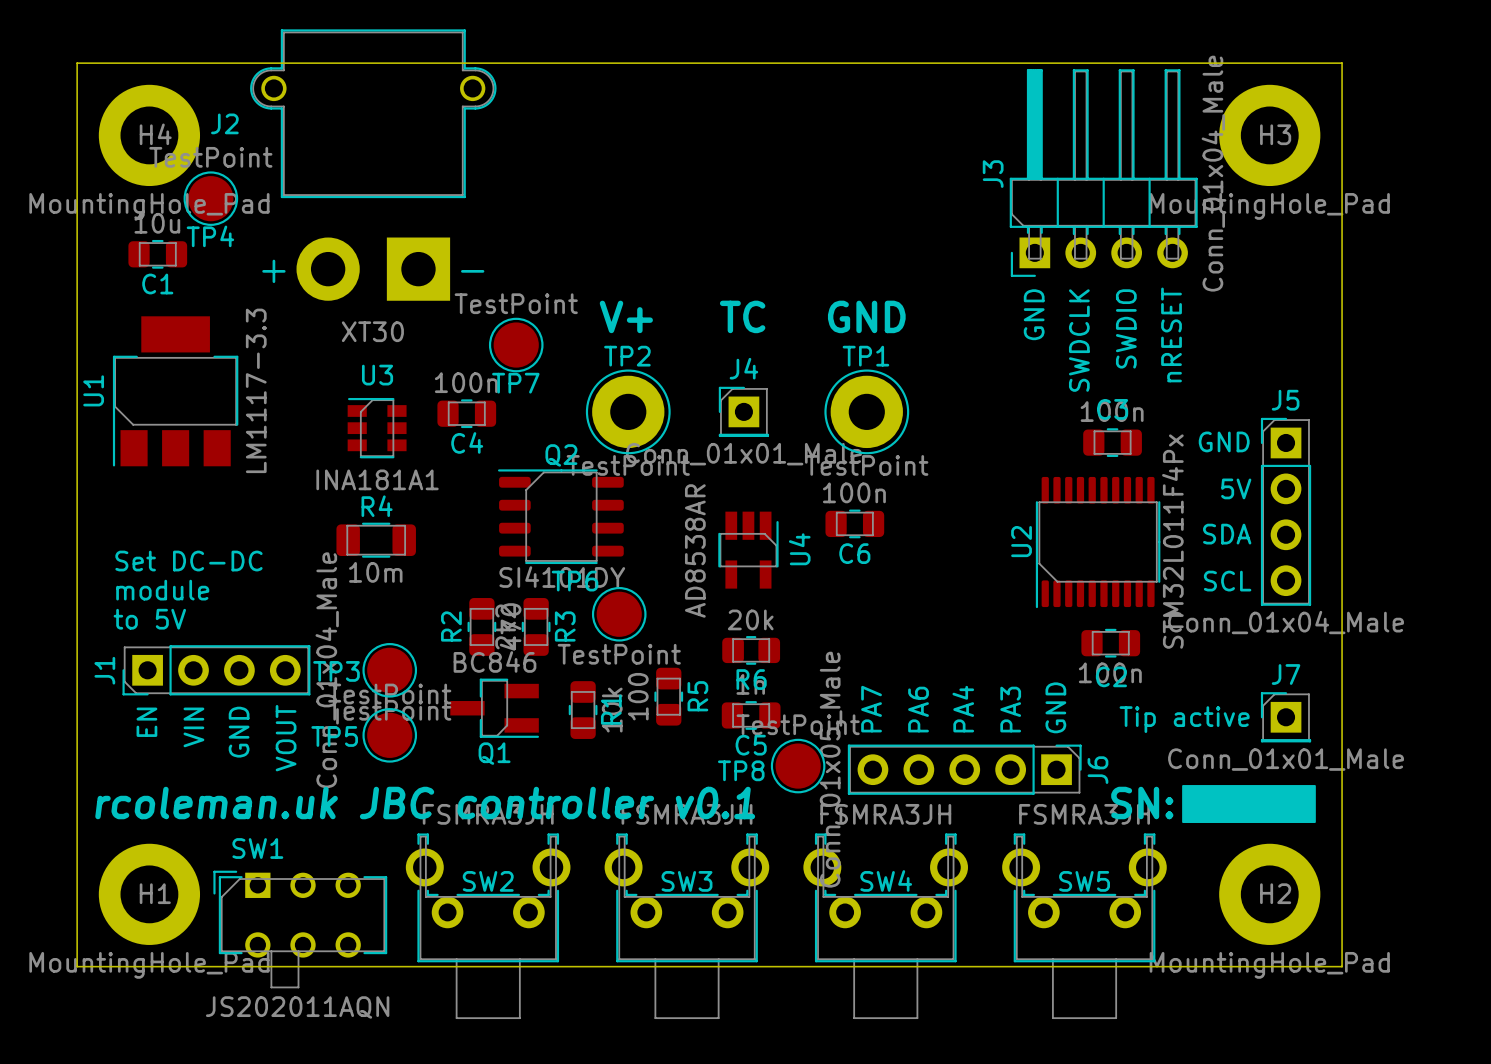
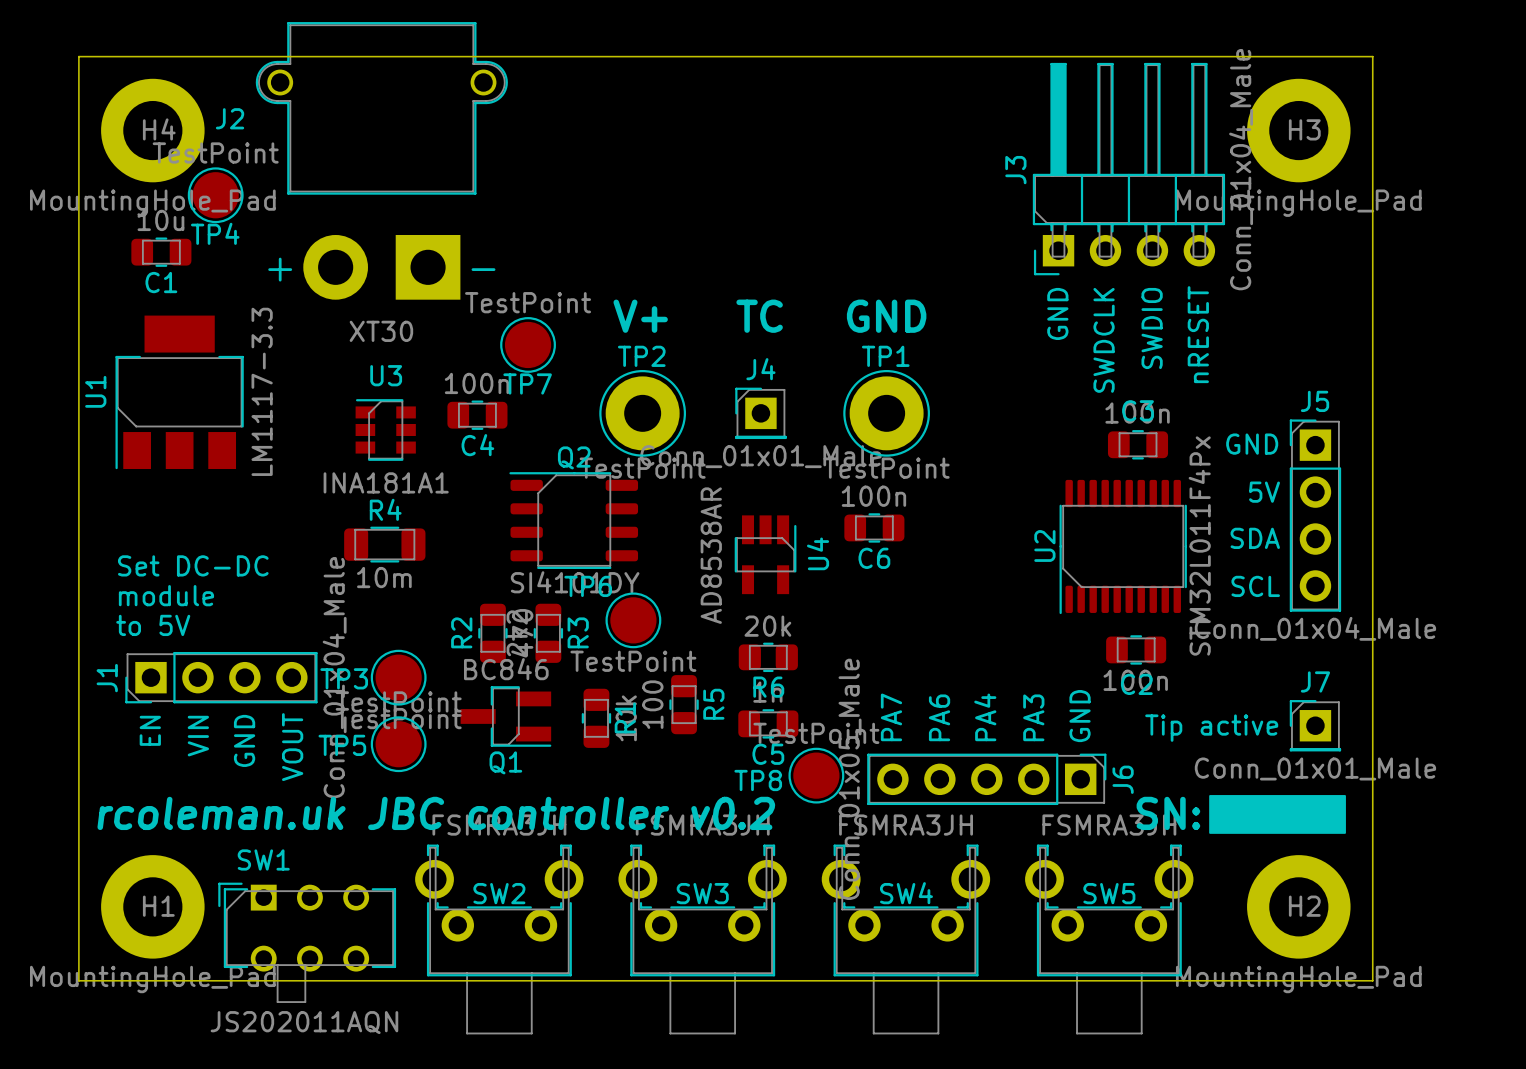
text: rcoleman.uk JBC controller v0.1 (425, 803) -> rcoleman.uk JBC controller v0.2 (436, 813)

